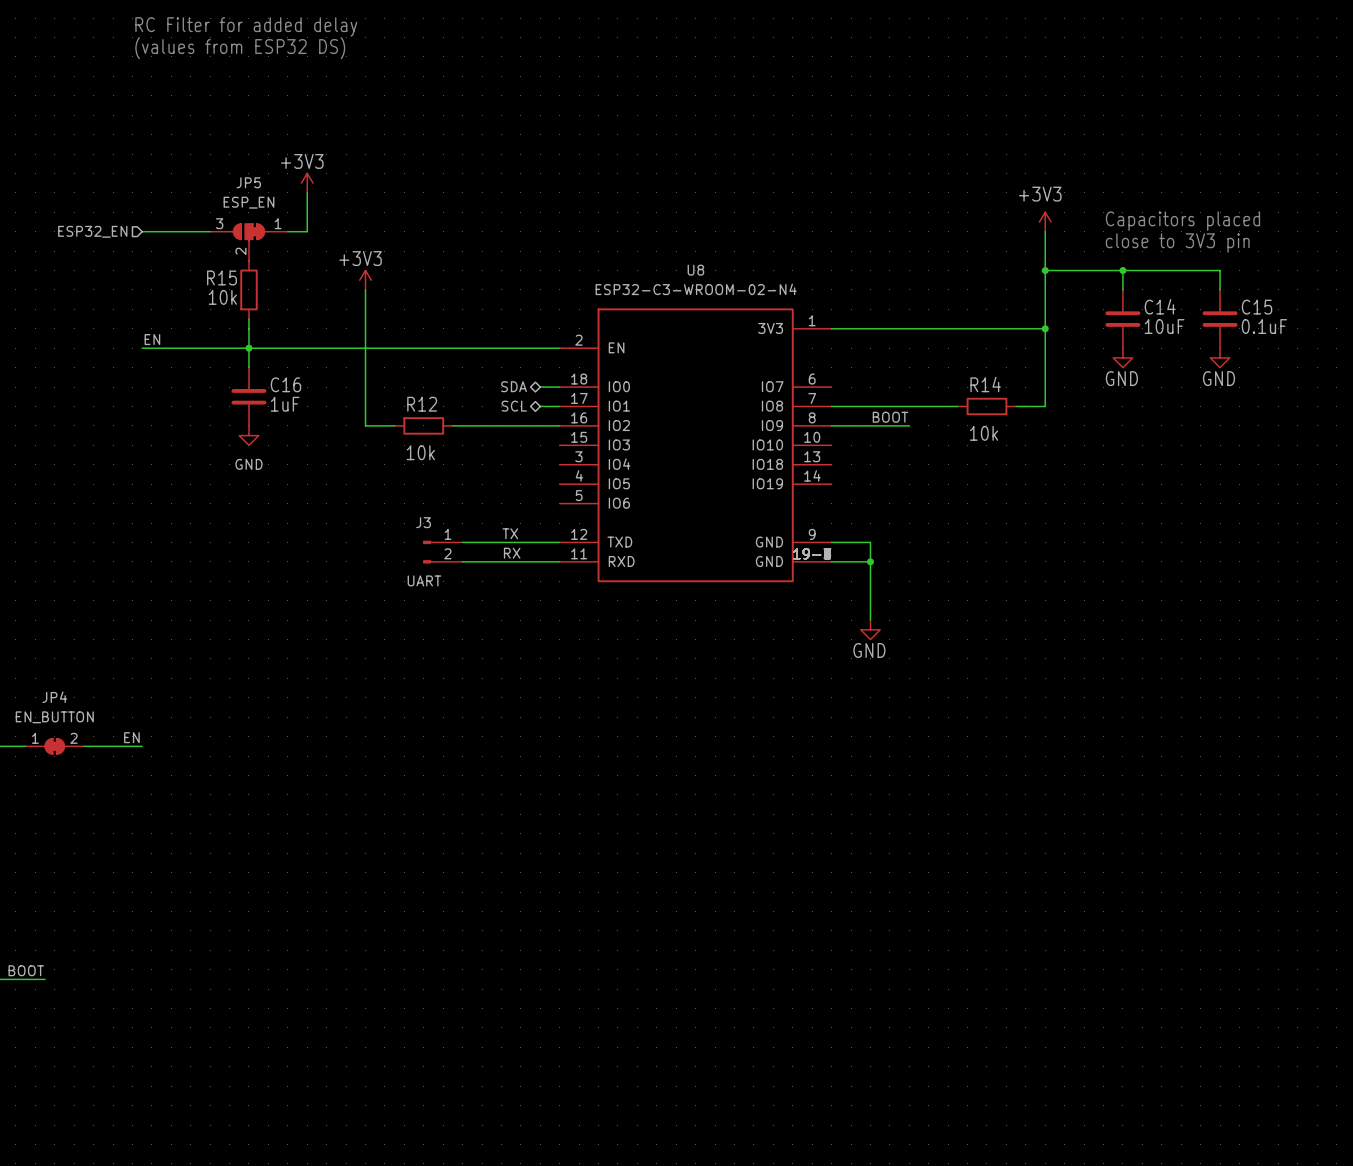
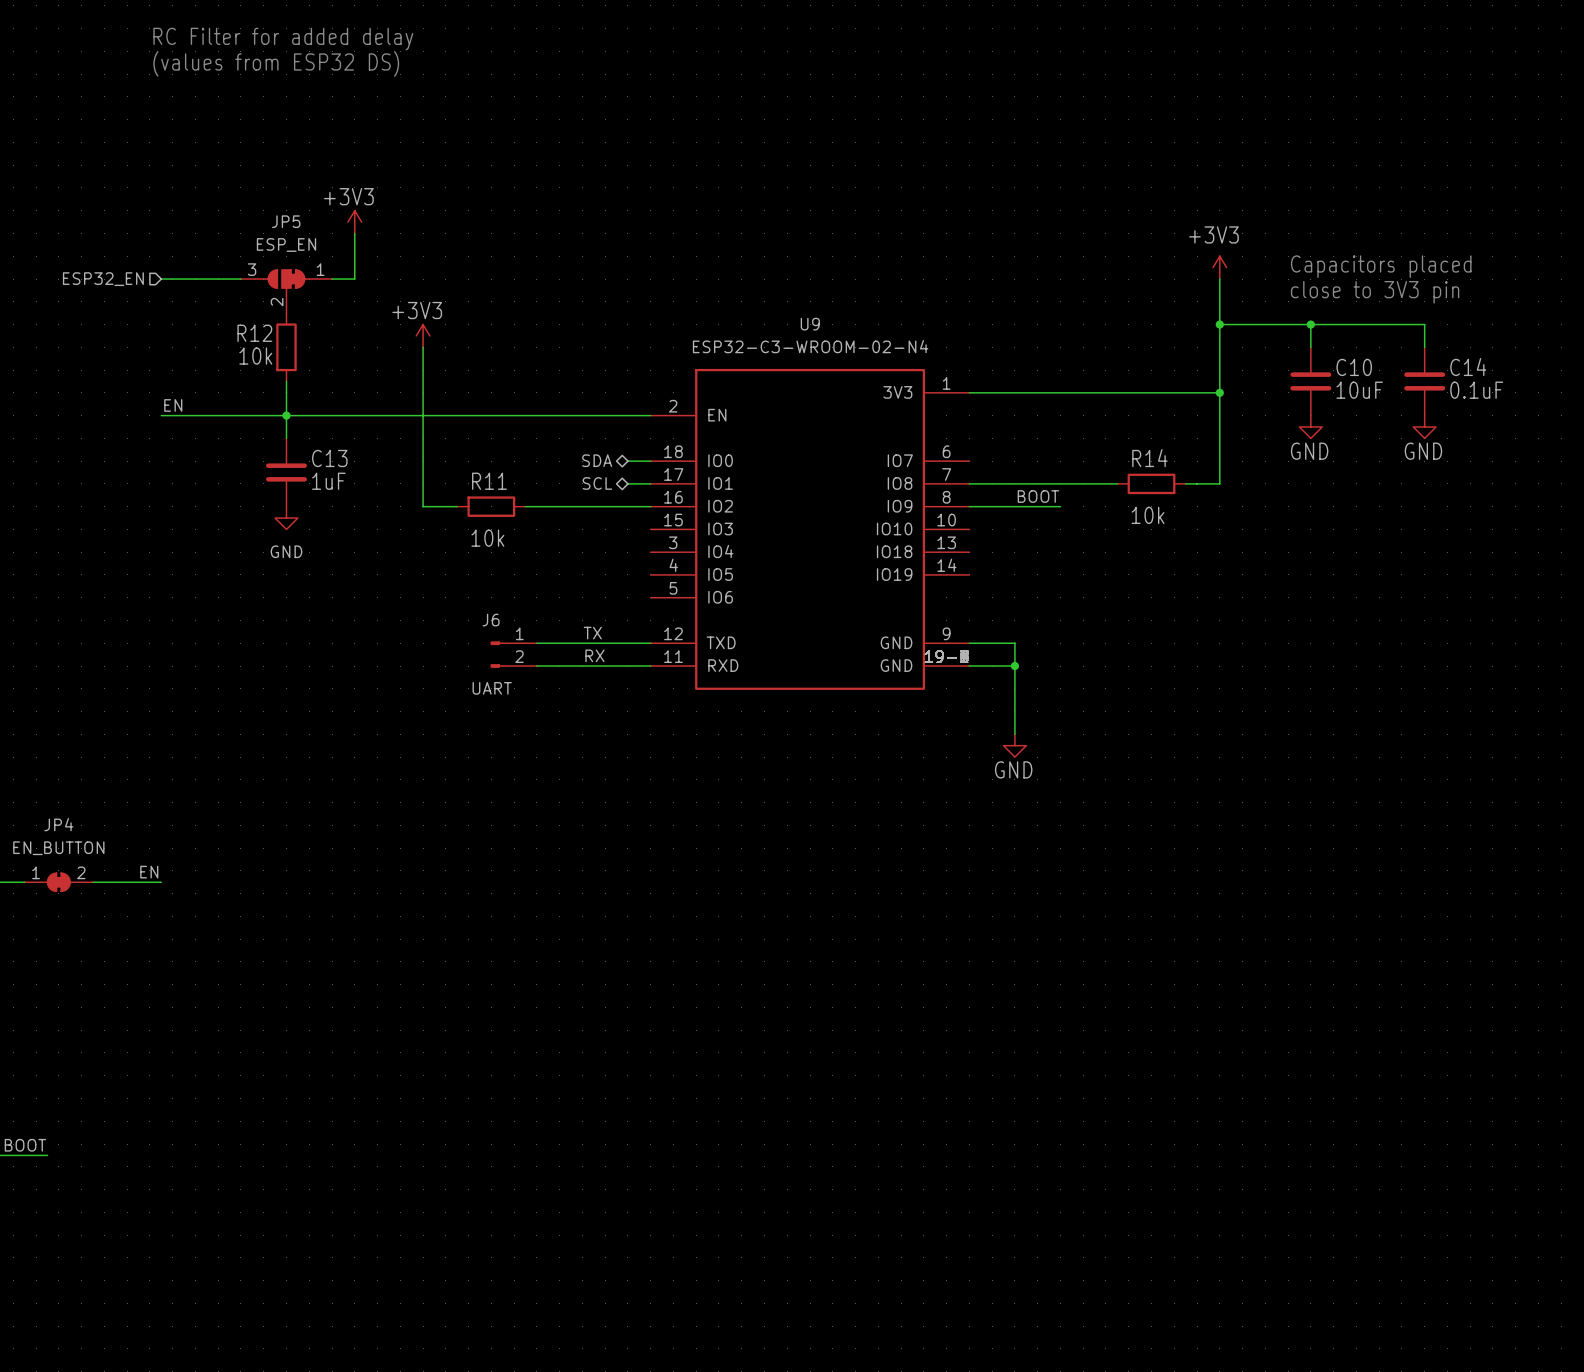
U8 name: U8 (695, 270) -> U9 (810, 324)
R15 name: R15 (222, 277) -> R12 (254, 333)
C14 name: C14 (1160, 306) -> C10 (1354, 367)
C15 name: C15 (1257, 307) -> C14 (1468, 367)
C16 name: C16 (285, 384) -> C13 (329, 458)
R12 name: R12 (422, 404) -> R11 (489, 481)
J3 name: J3 (423, 522) -> J6 (491, 620)

